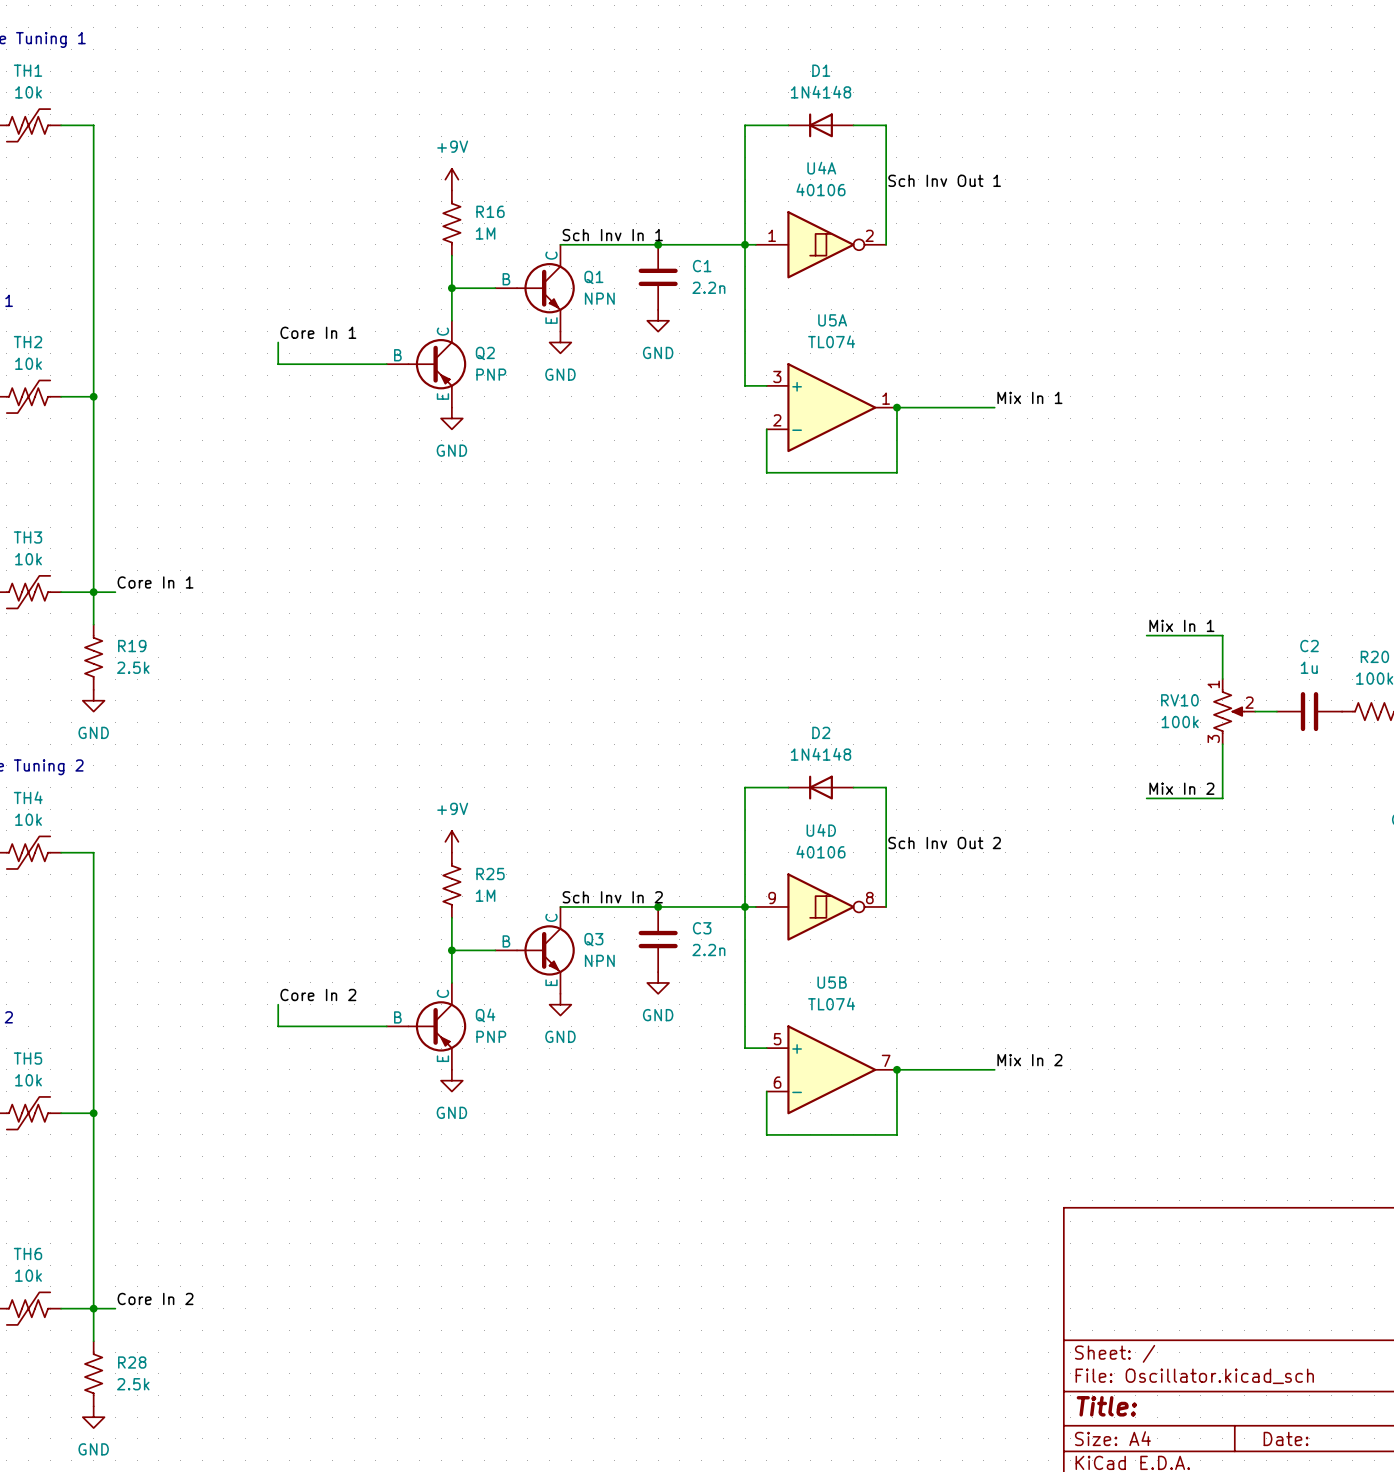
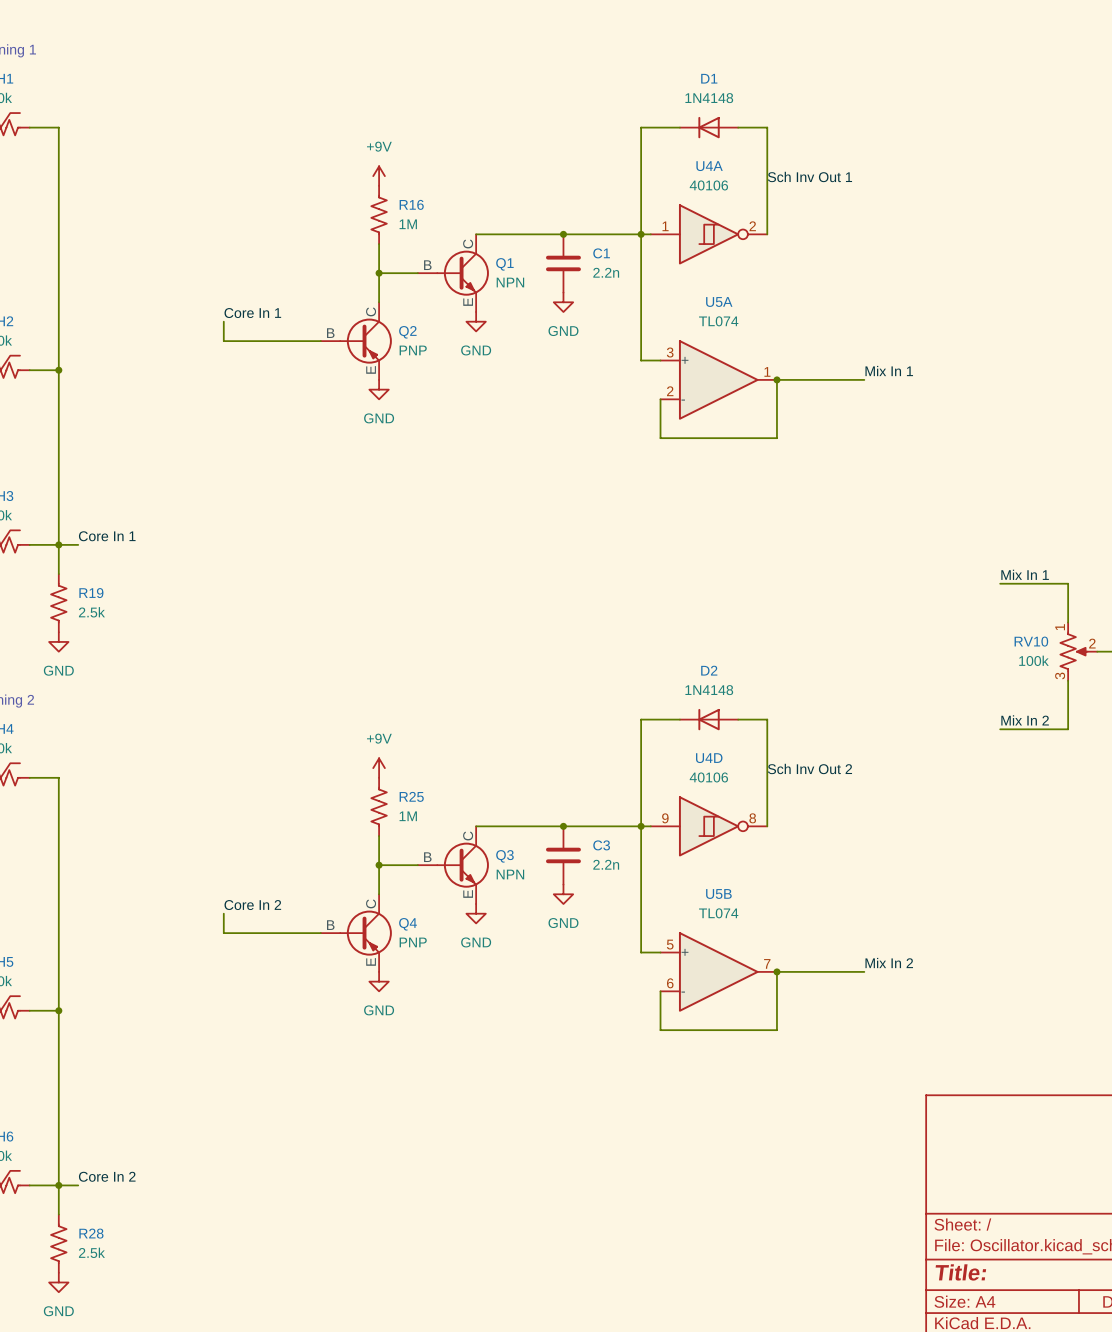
label: Sch Inv In 1 (612, 235) -> none
label: Sch Inv In 2 (612, 897) -> none

